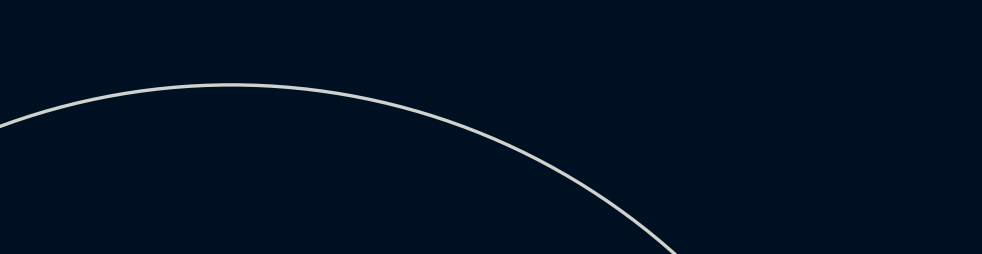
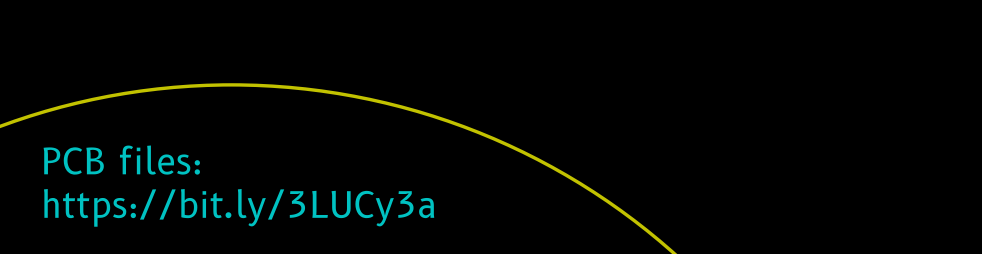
text: none -> PCB files: (121, 160)
text: none -> https://bit.ly/3LUCy3a (239, 207)

